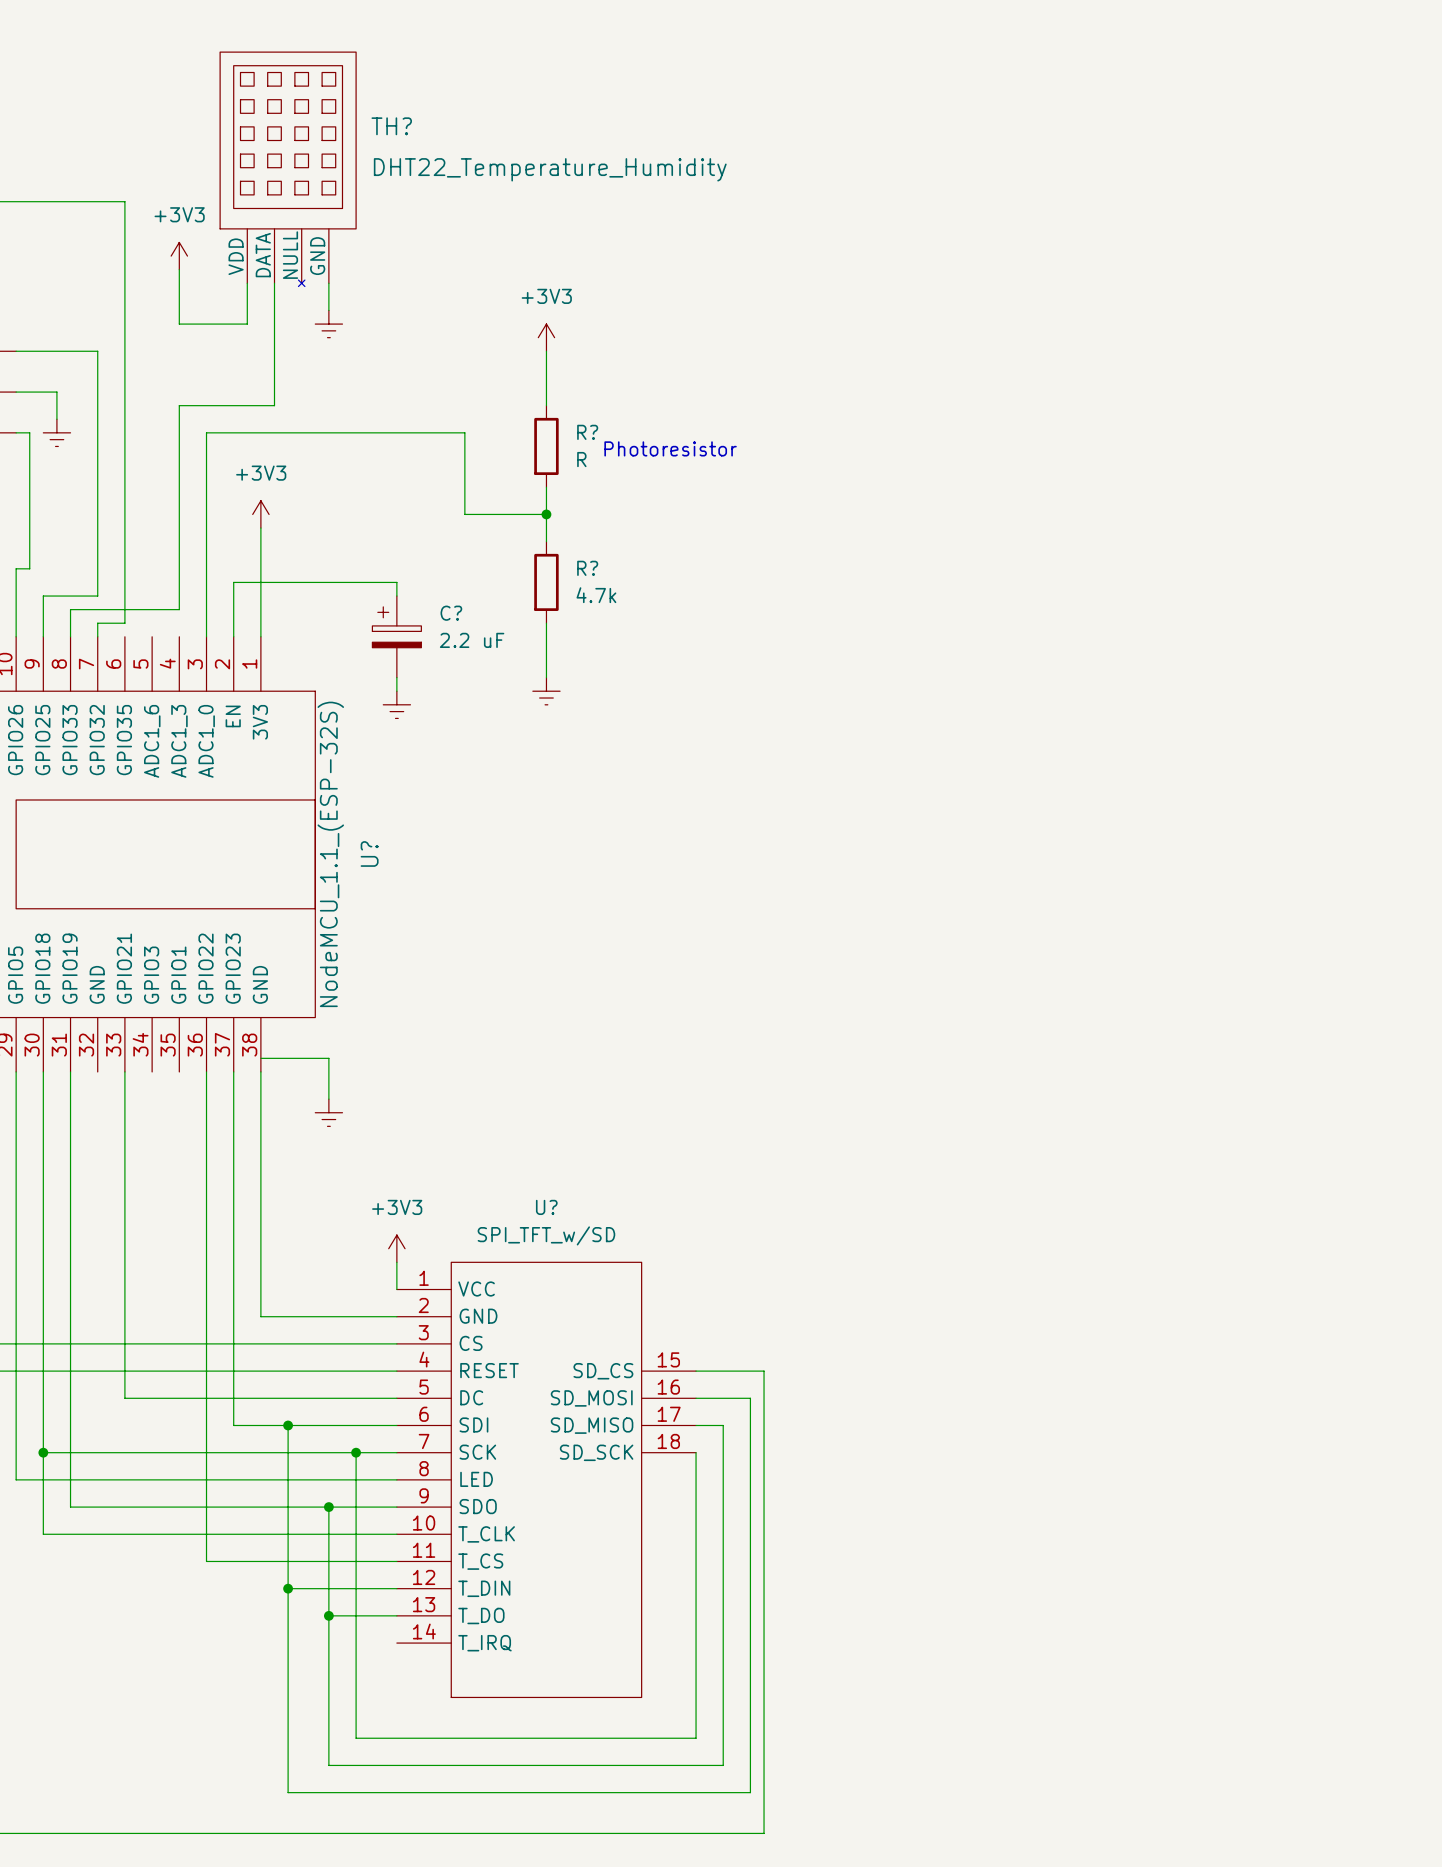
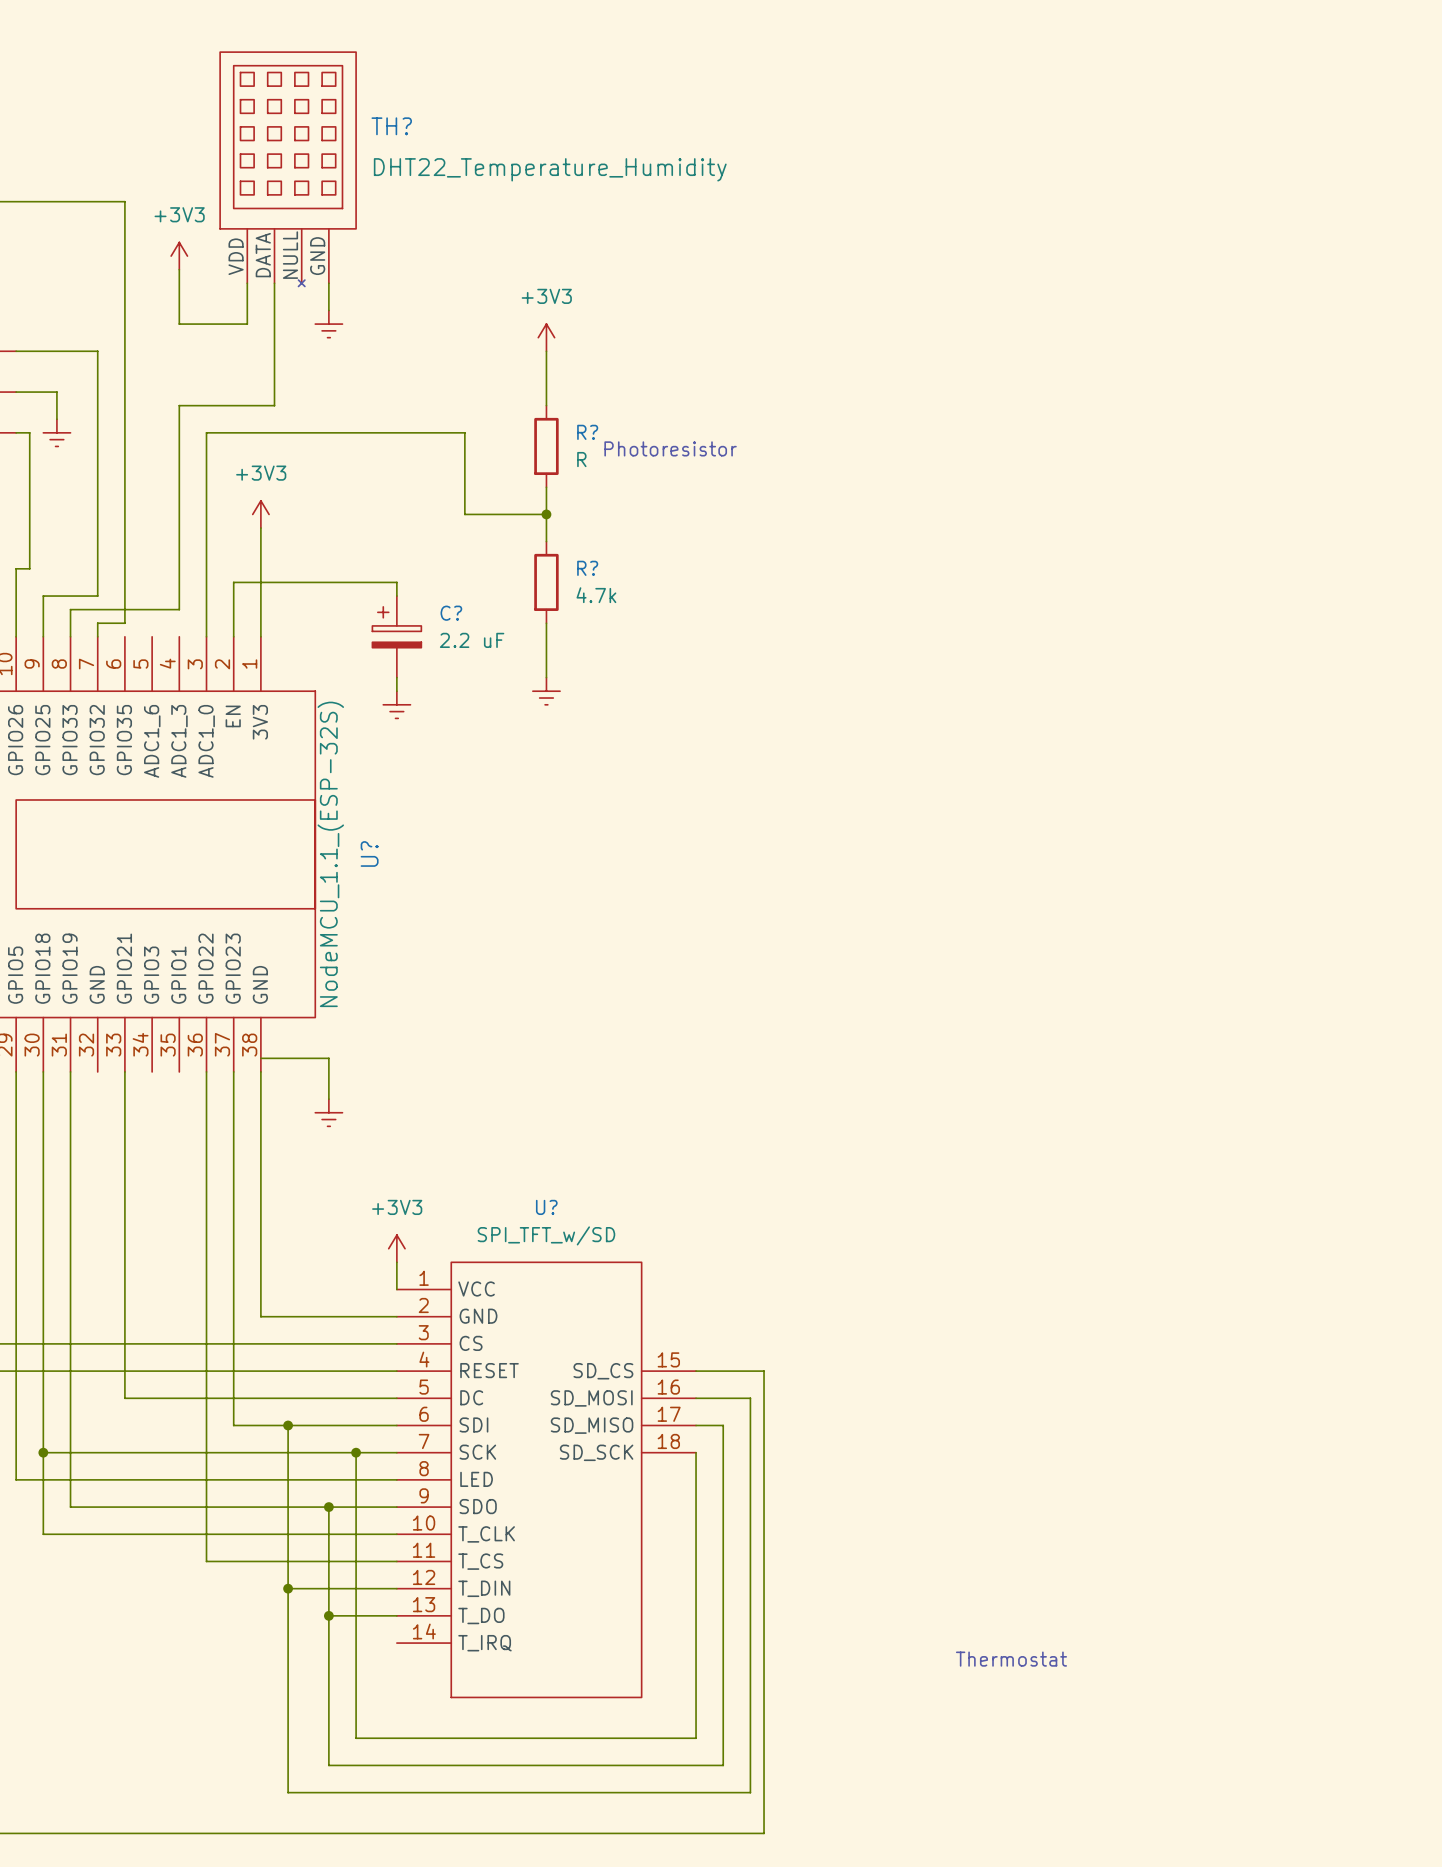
text: none -> Thermostat (1011, 1659)

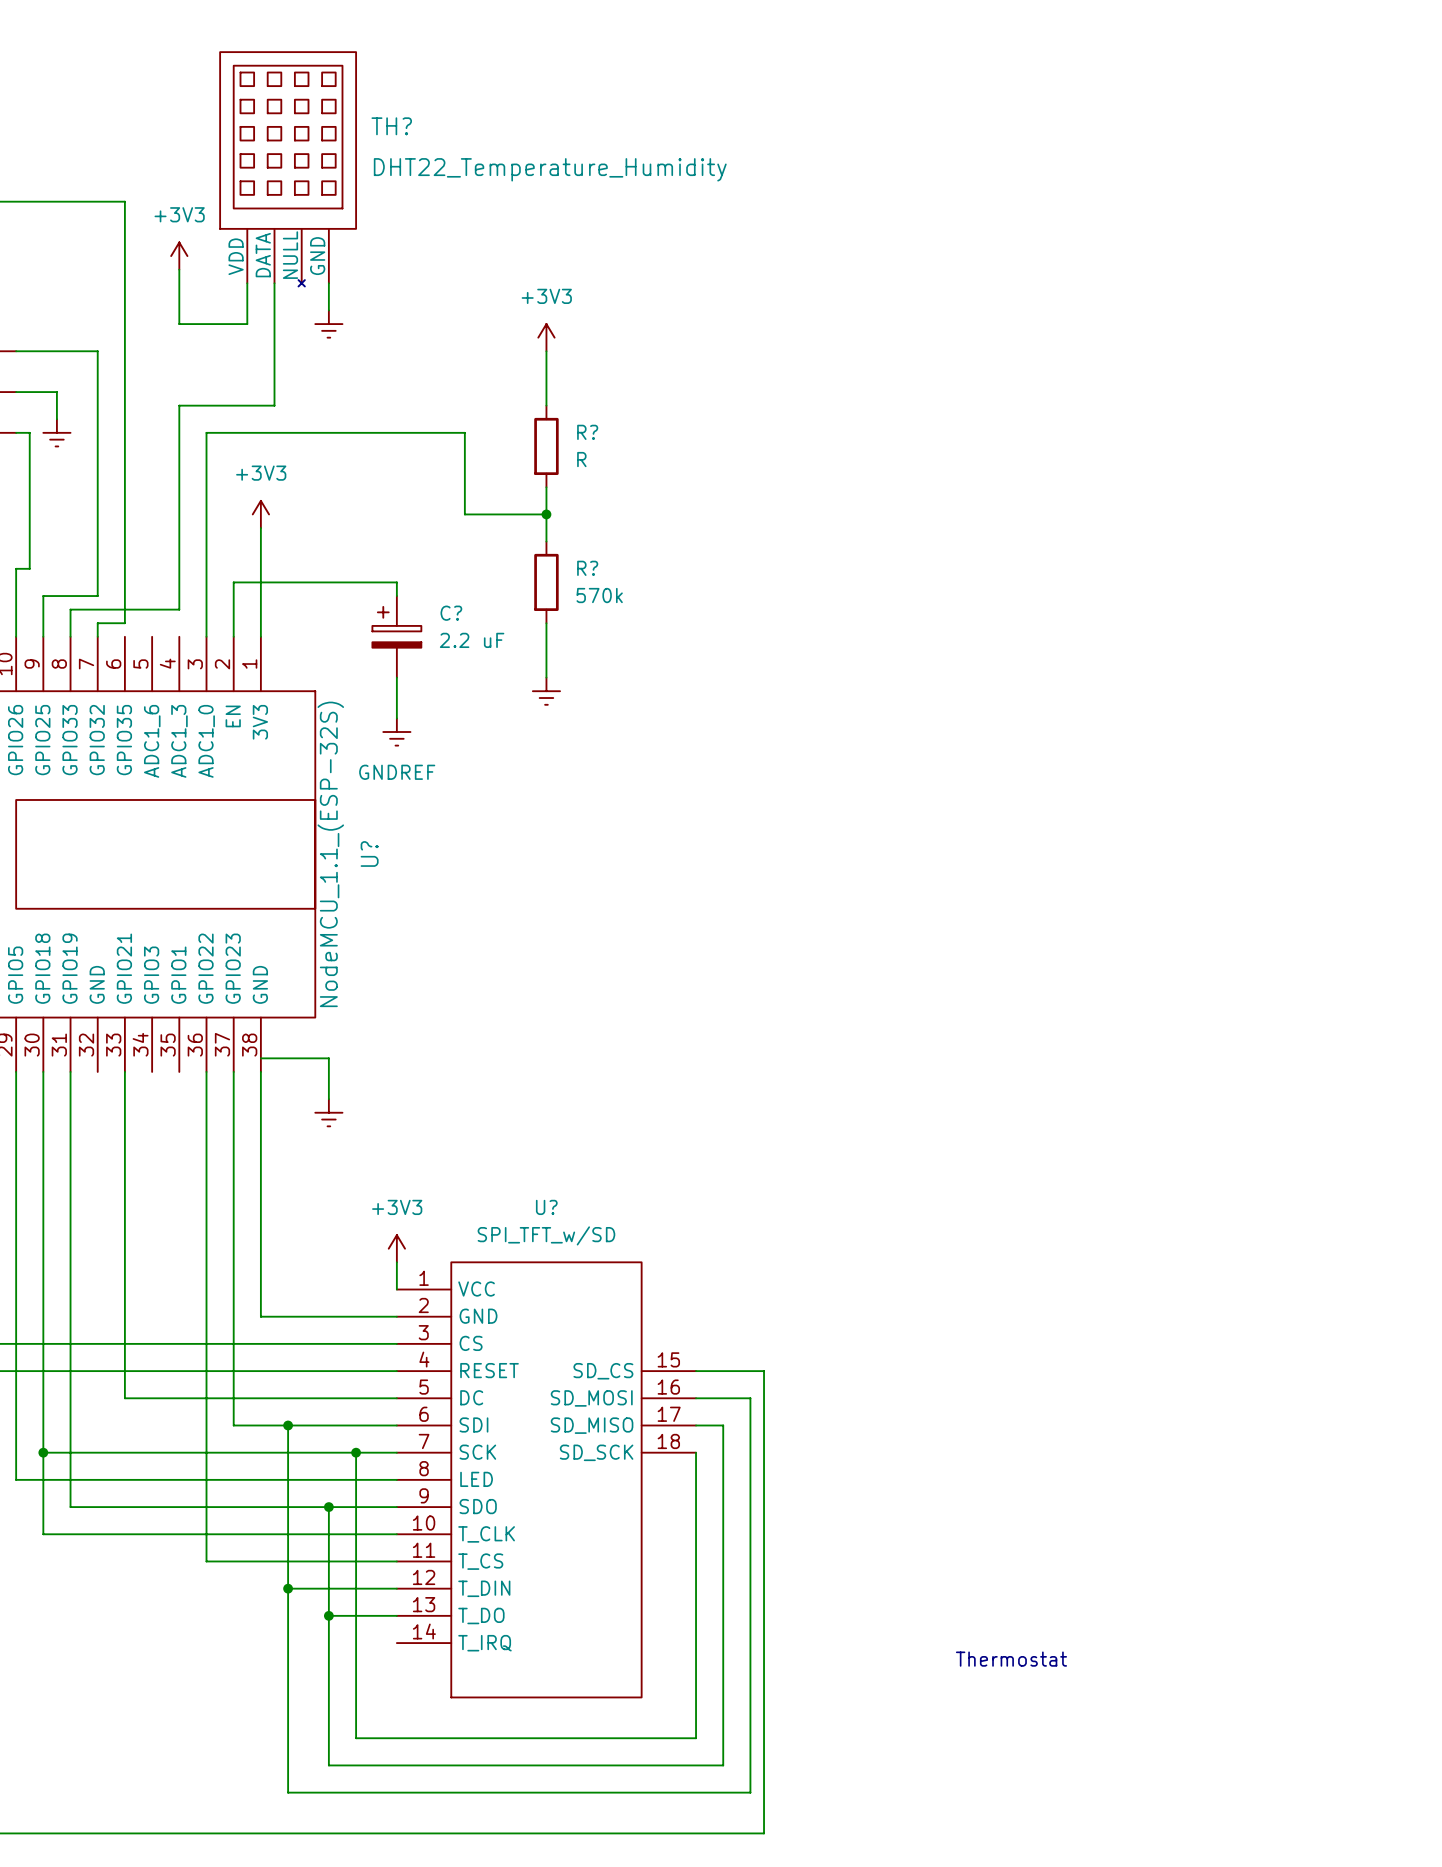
text: Photoresistor (670, 448) -> none
R? value: 4.7k (596, 595) -> 570k (599, 595)
power symbol: (396, 704) -> none
power symbol: none -> GNDREF (396, 732)

